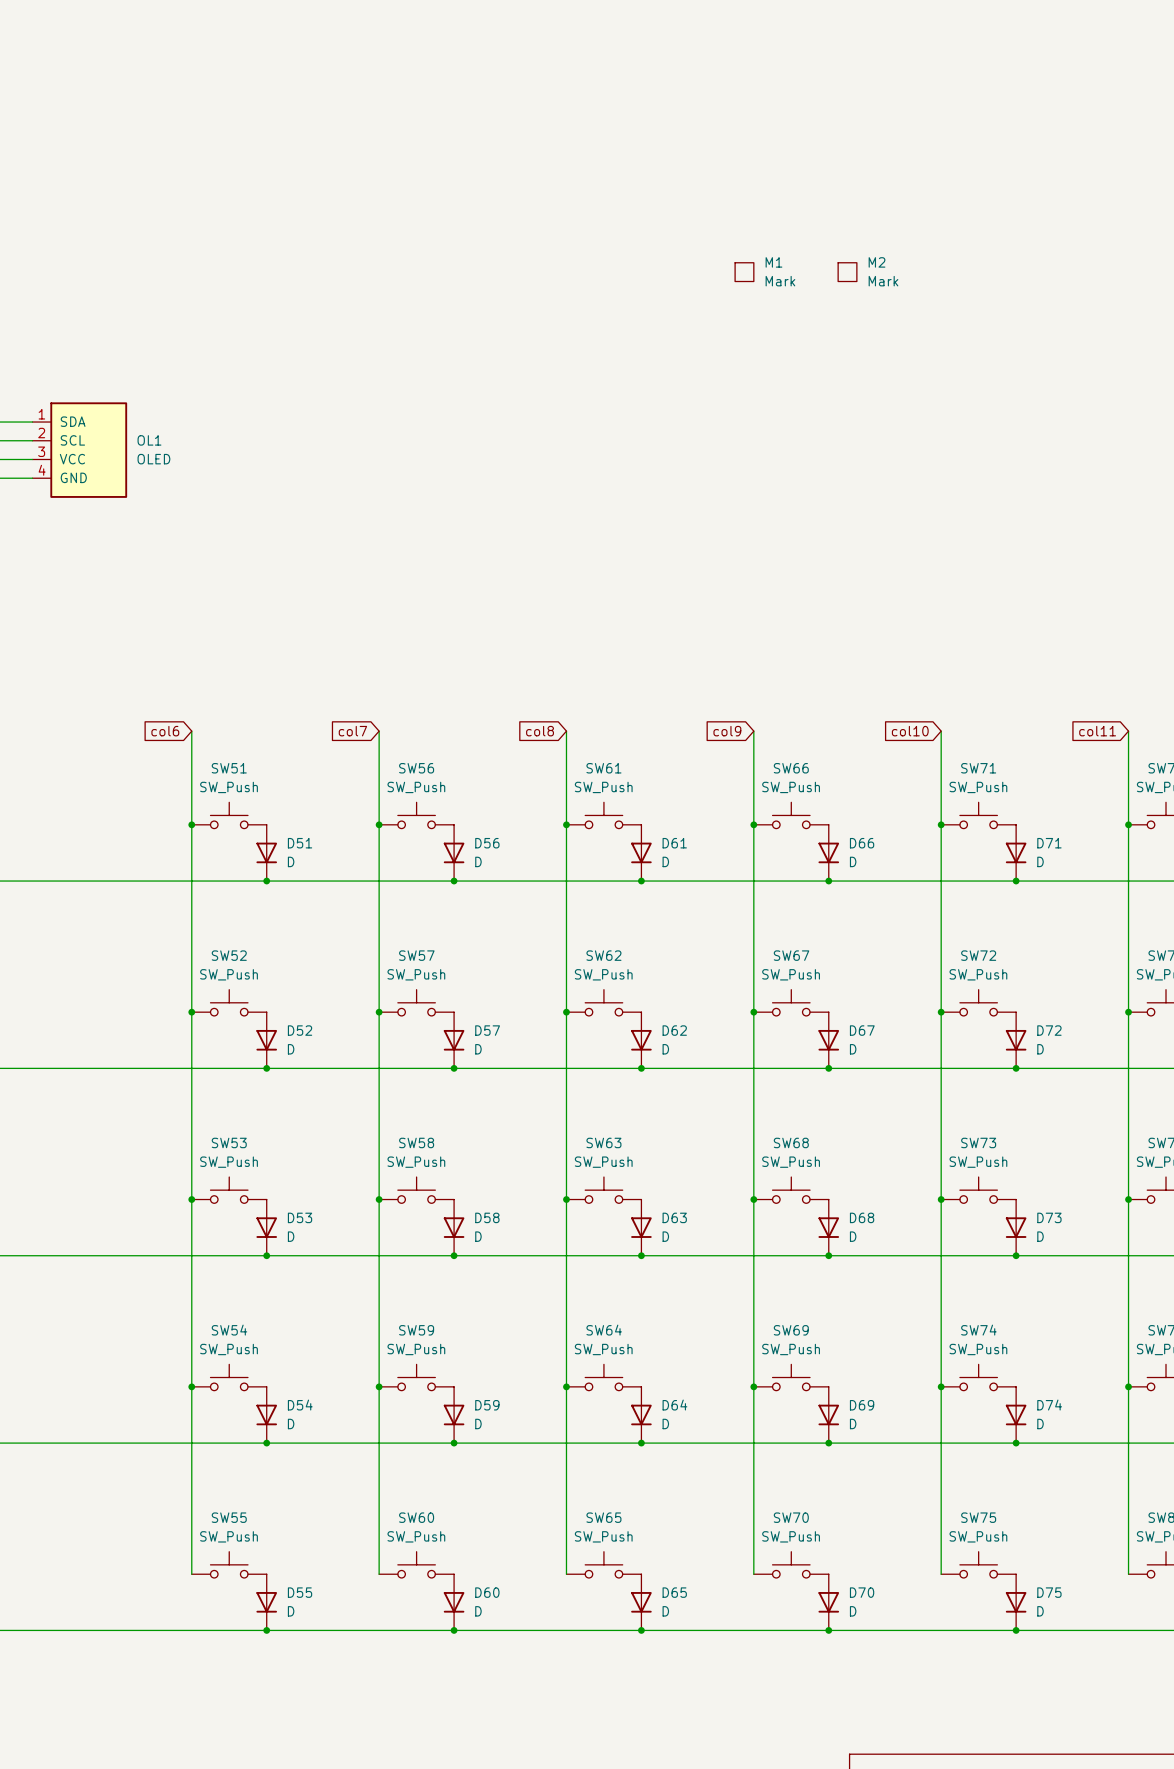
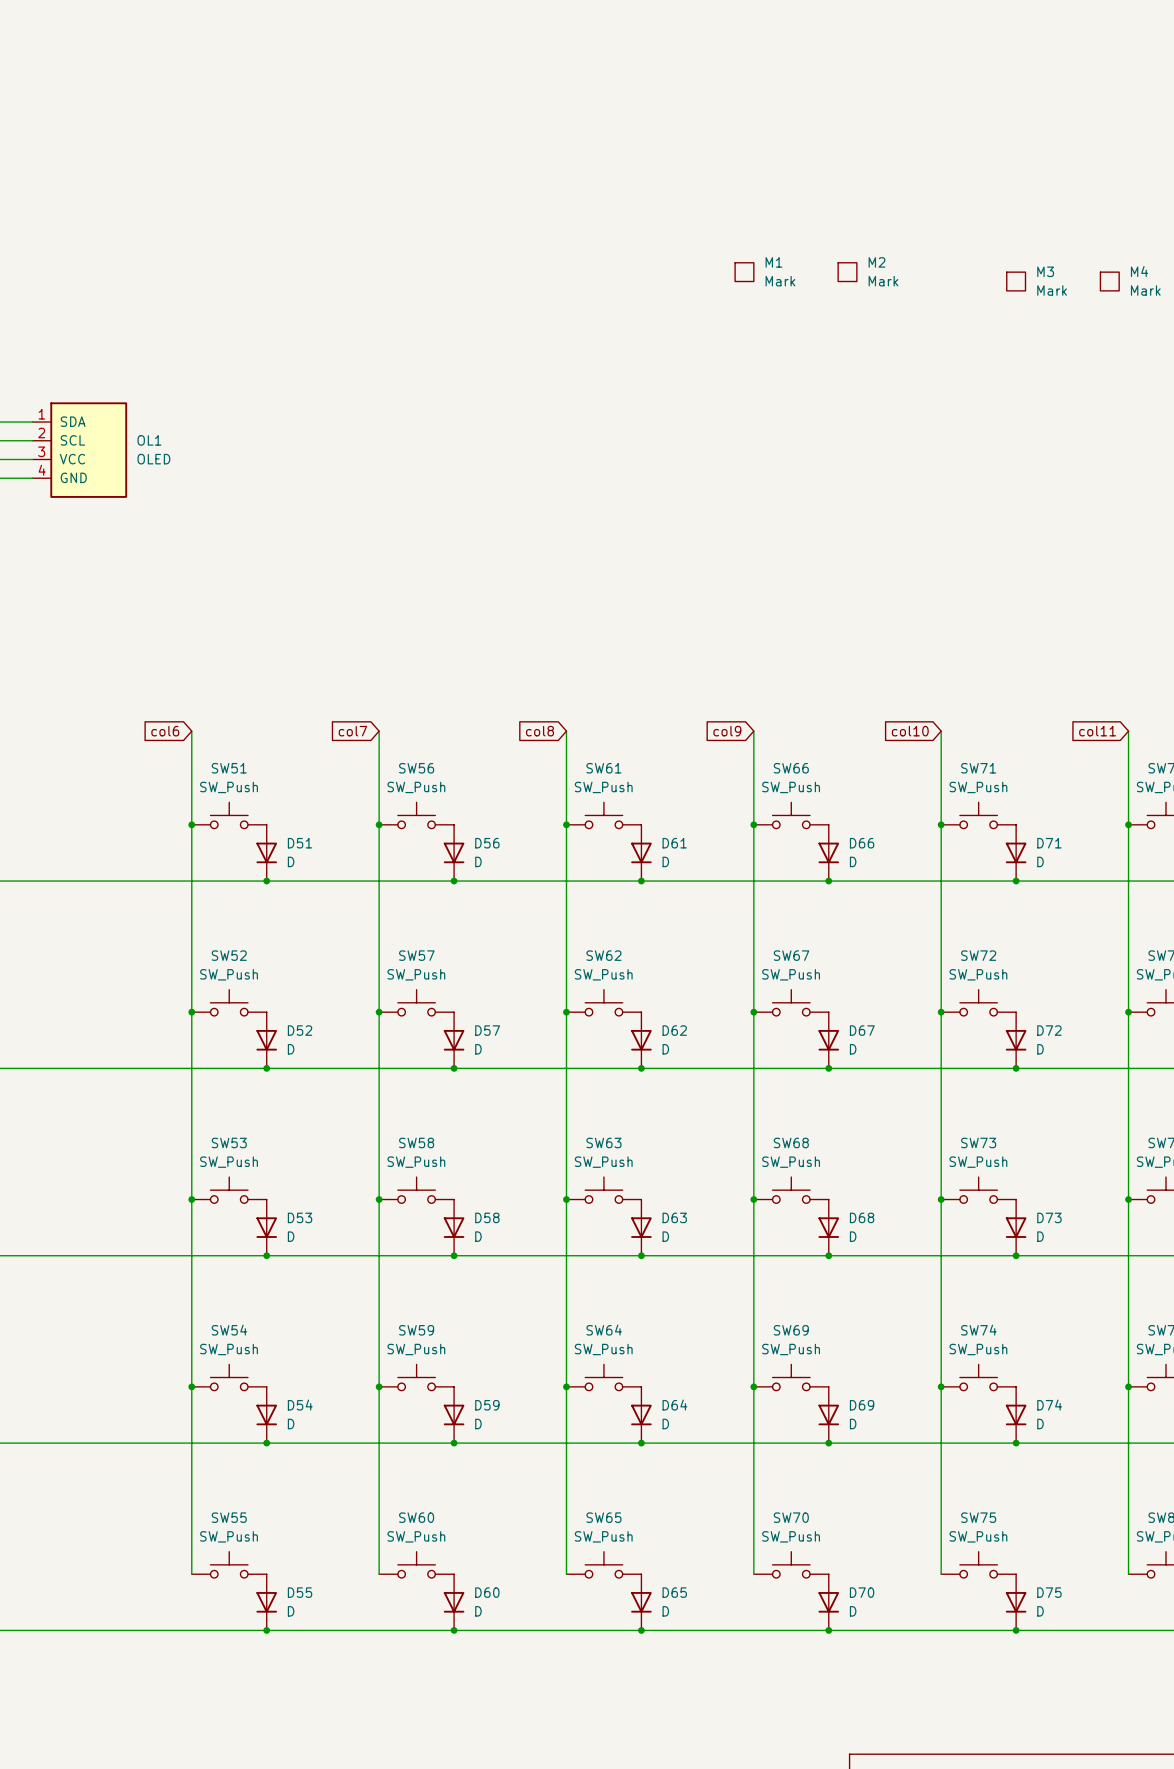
M3: none -> Mark (1016, 281)
M4: none -> Mark (1109, 281)

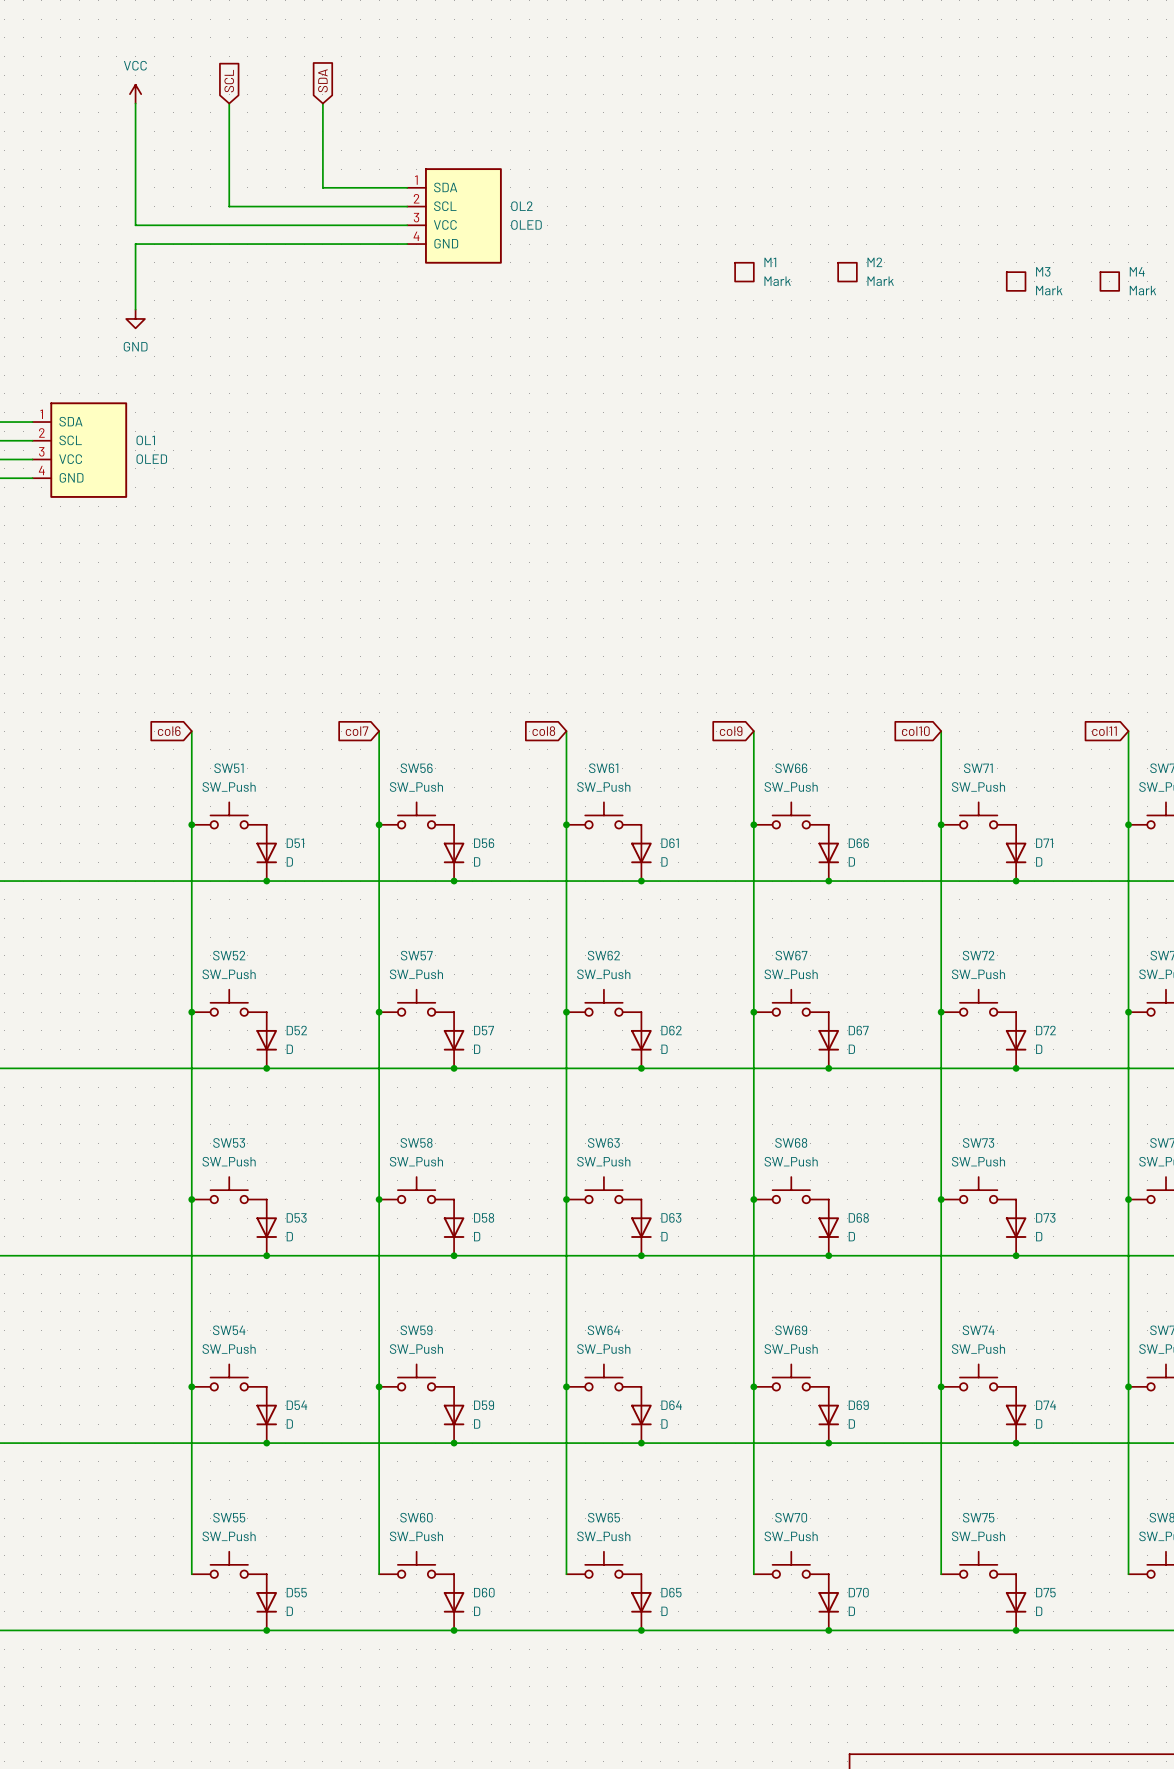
global label: none -> SCL (229, 81)
global label: none -> SDA (322, 80)
power symbol: none -> VCC (135, 94)
wire: none -> (135, 103) (135, 225) (407, 225)
wire: none -> (229, 103) (229, 206) (407, 206)
wire: none -> (322, 103) (322, 187) (407, 187)
OL2: none -> OLED (454, 215)
wire: none -> (407, 244) (135, 244) (135, 309)
power symbol: none -> GND (135, 318)

